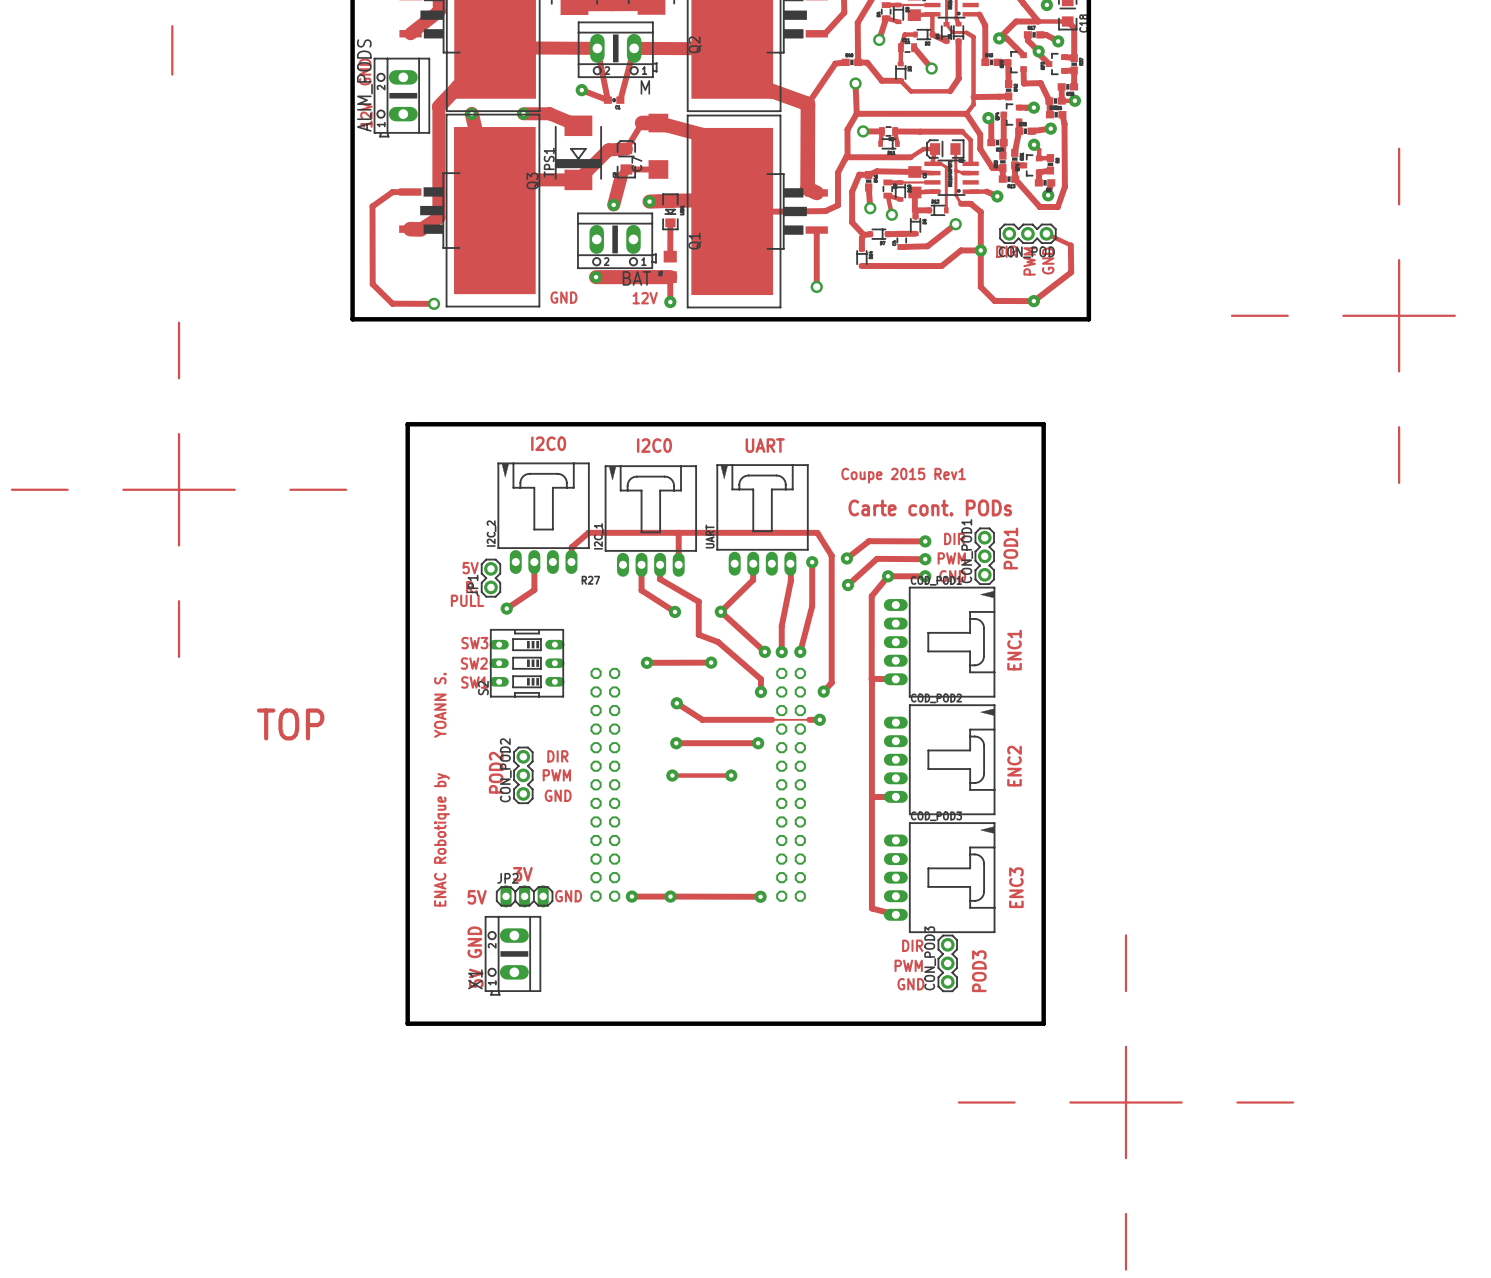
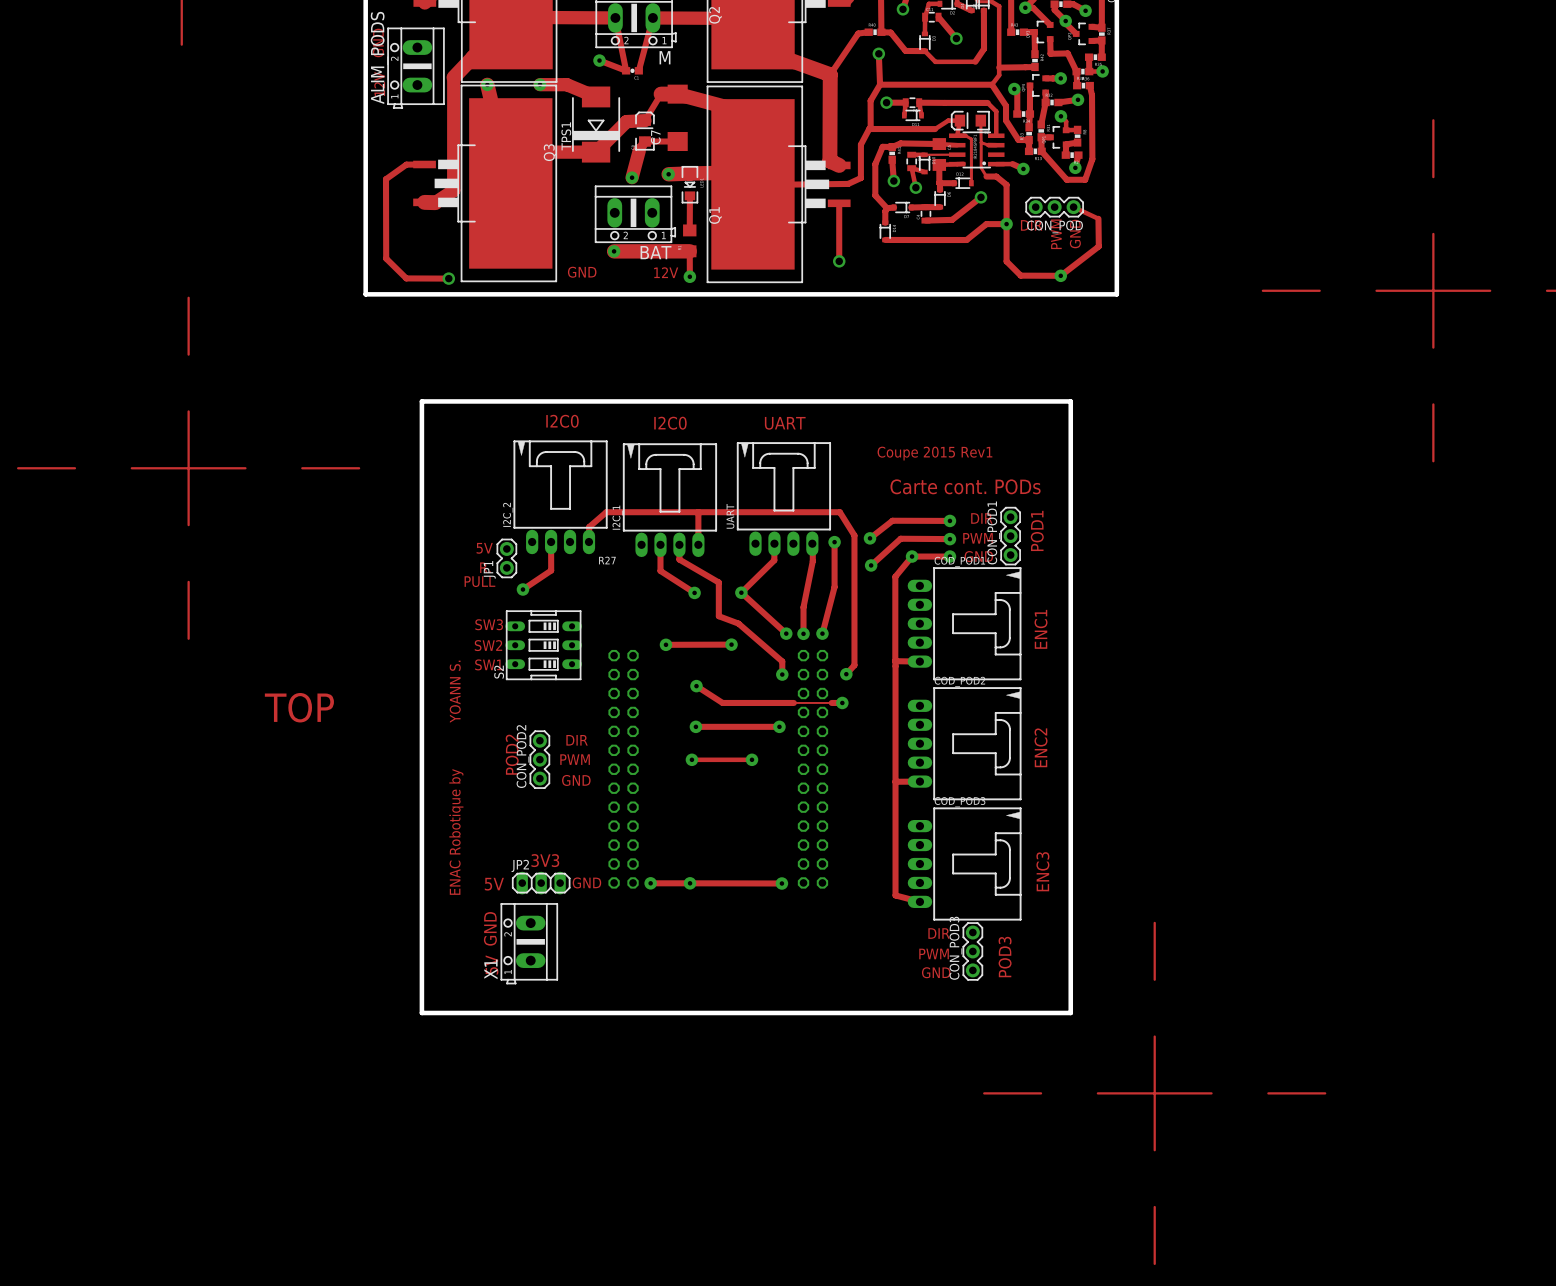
text: 3V (522, 874) -> 3V3 (545, 860)

